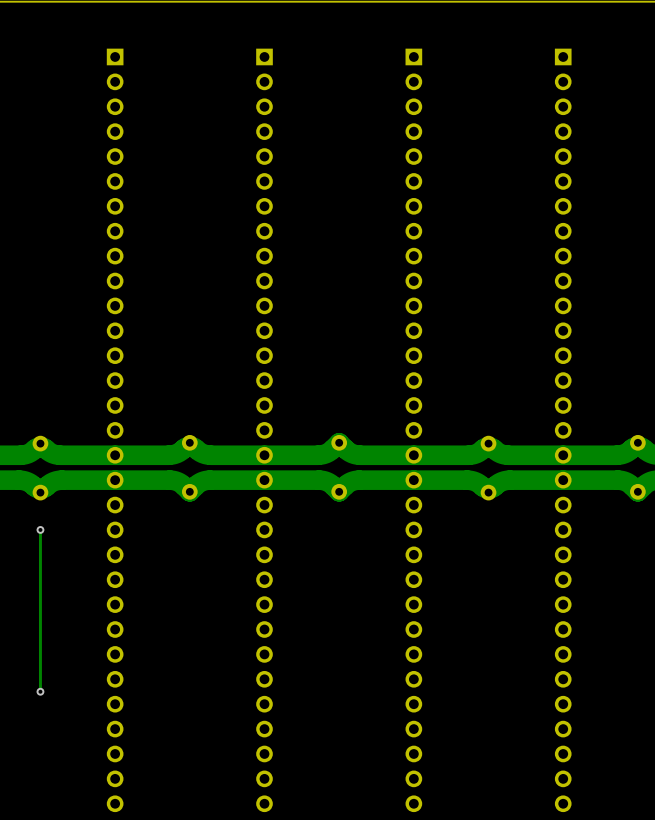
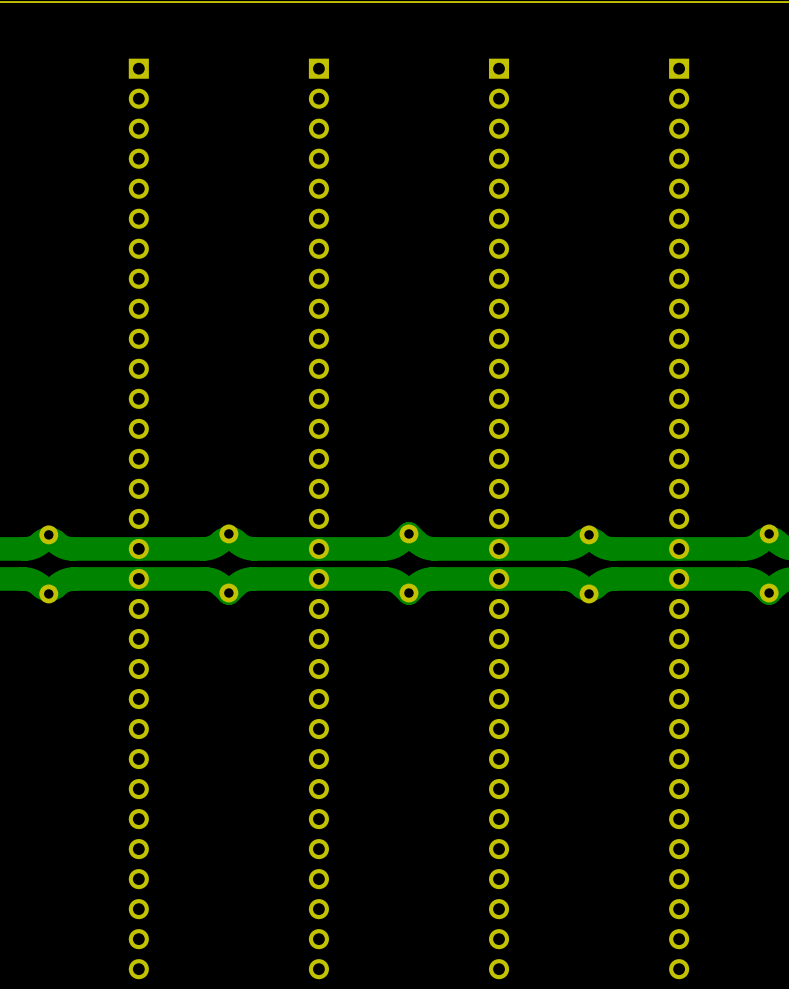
track: (40, 529) (40, 691) -> none
via: (40, 529) -> none
via: (40, 691) -> none

